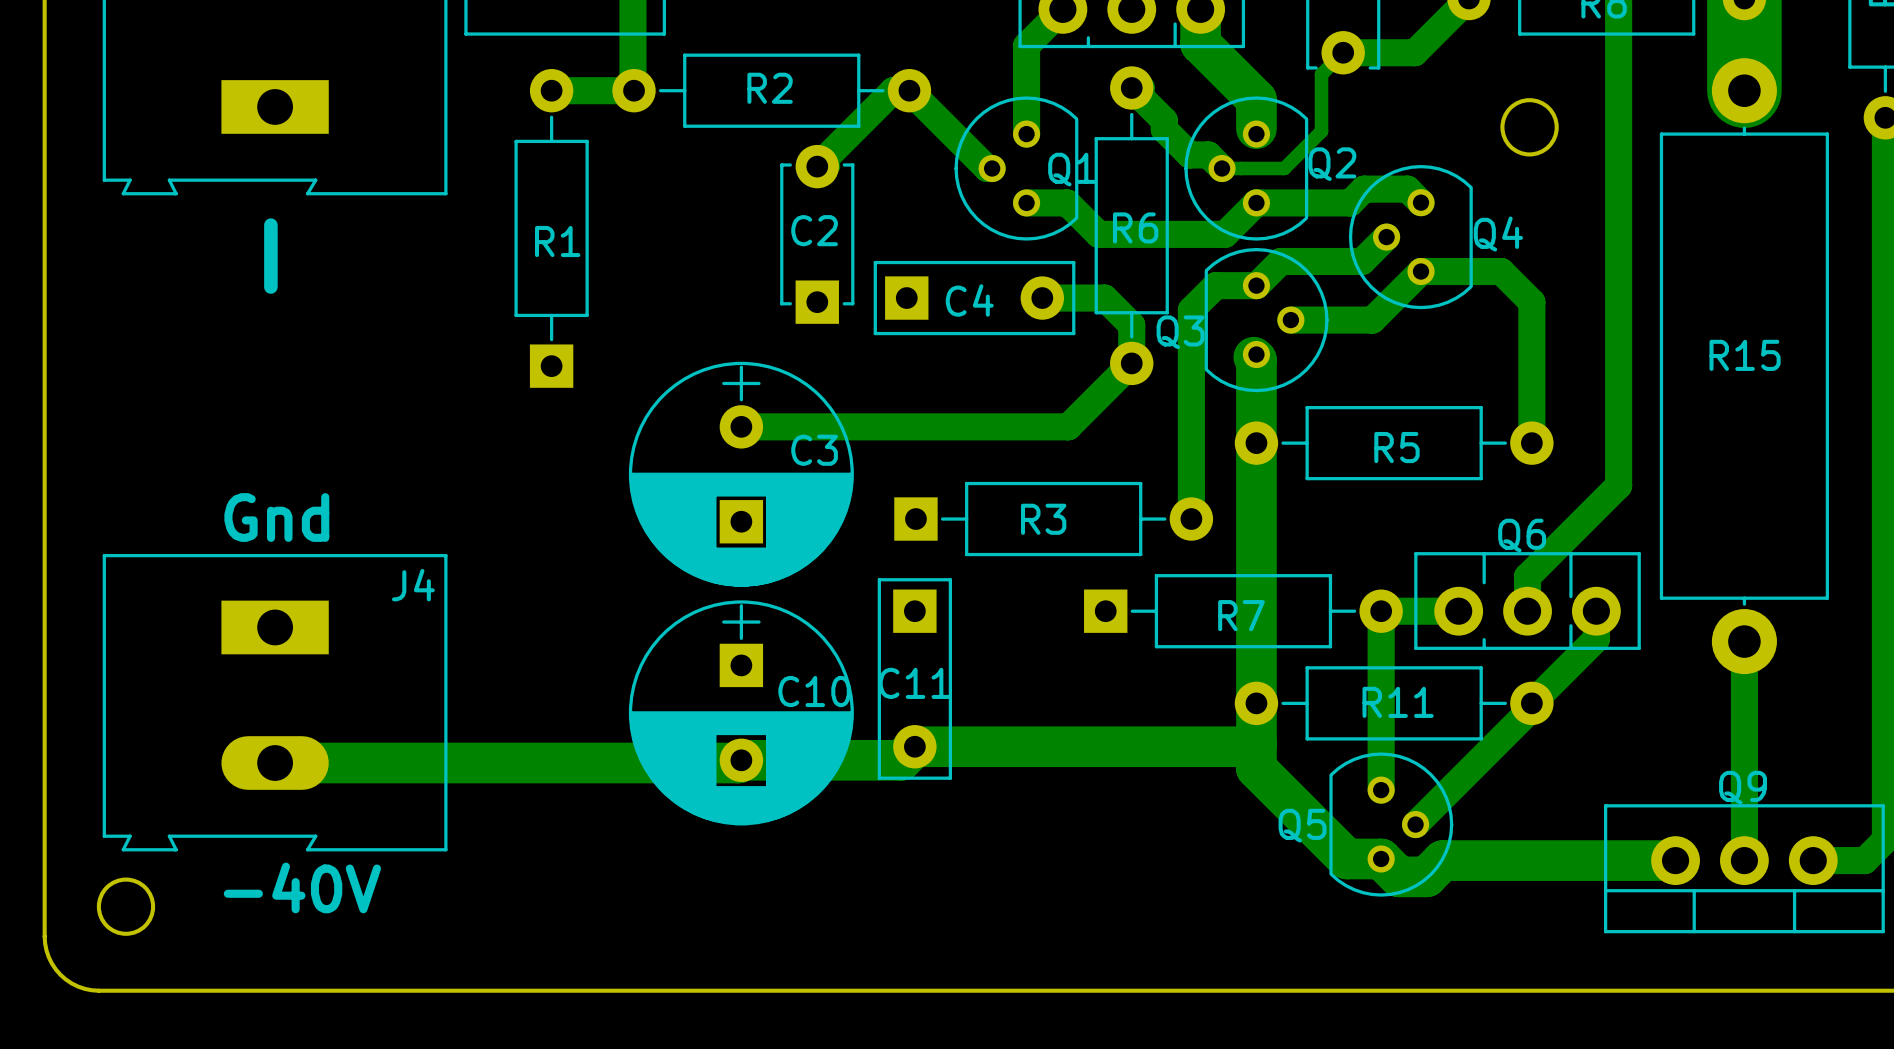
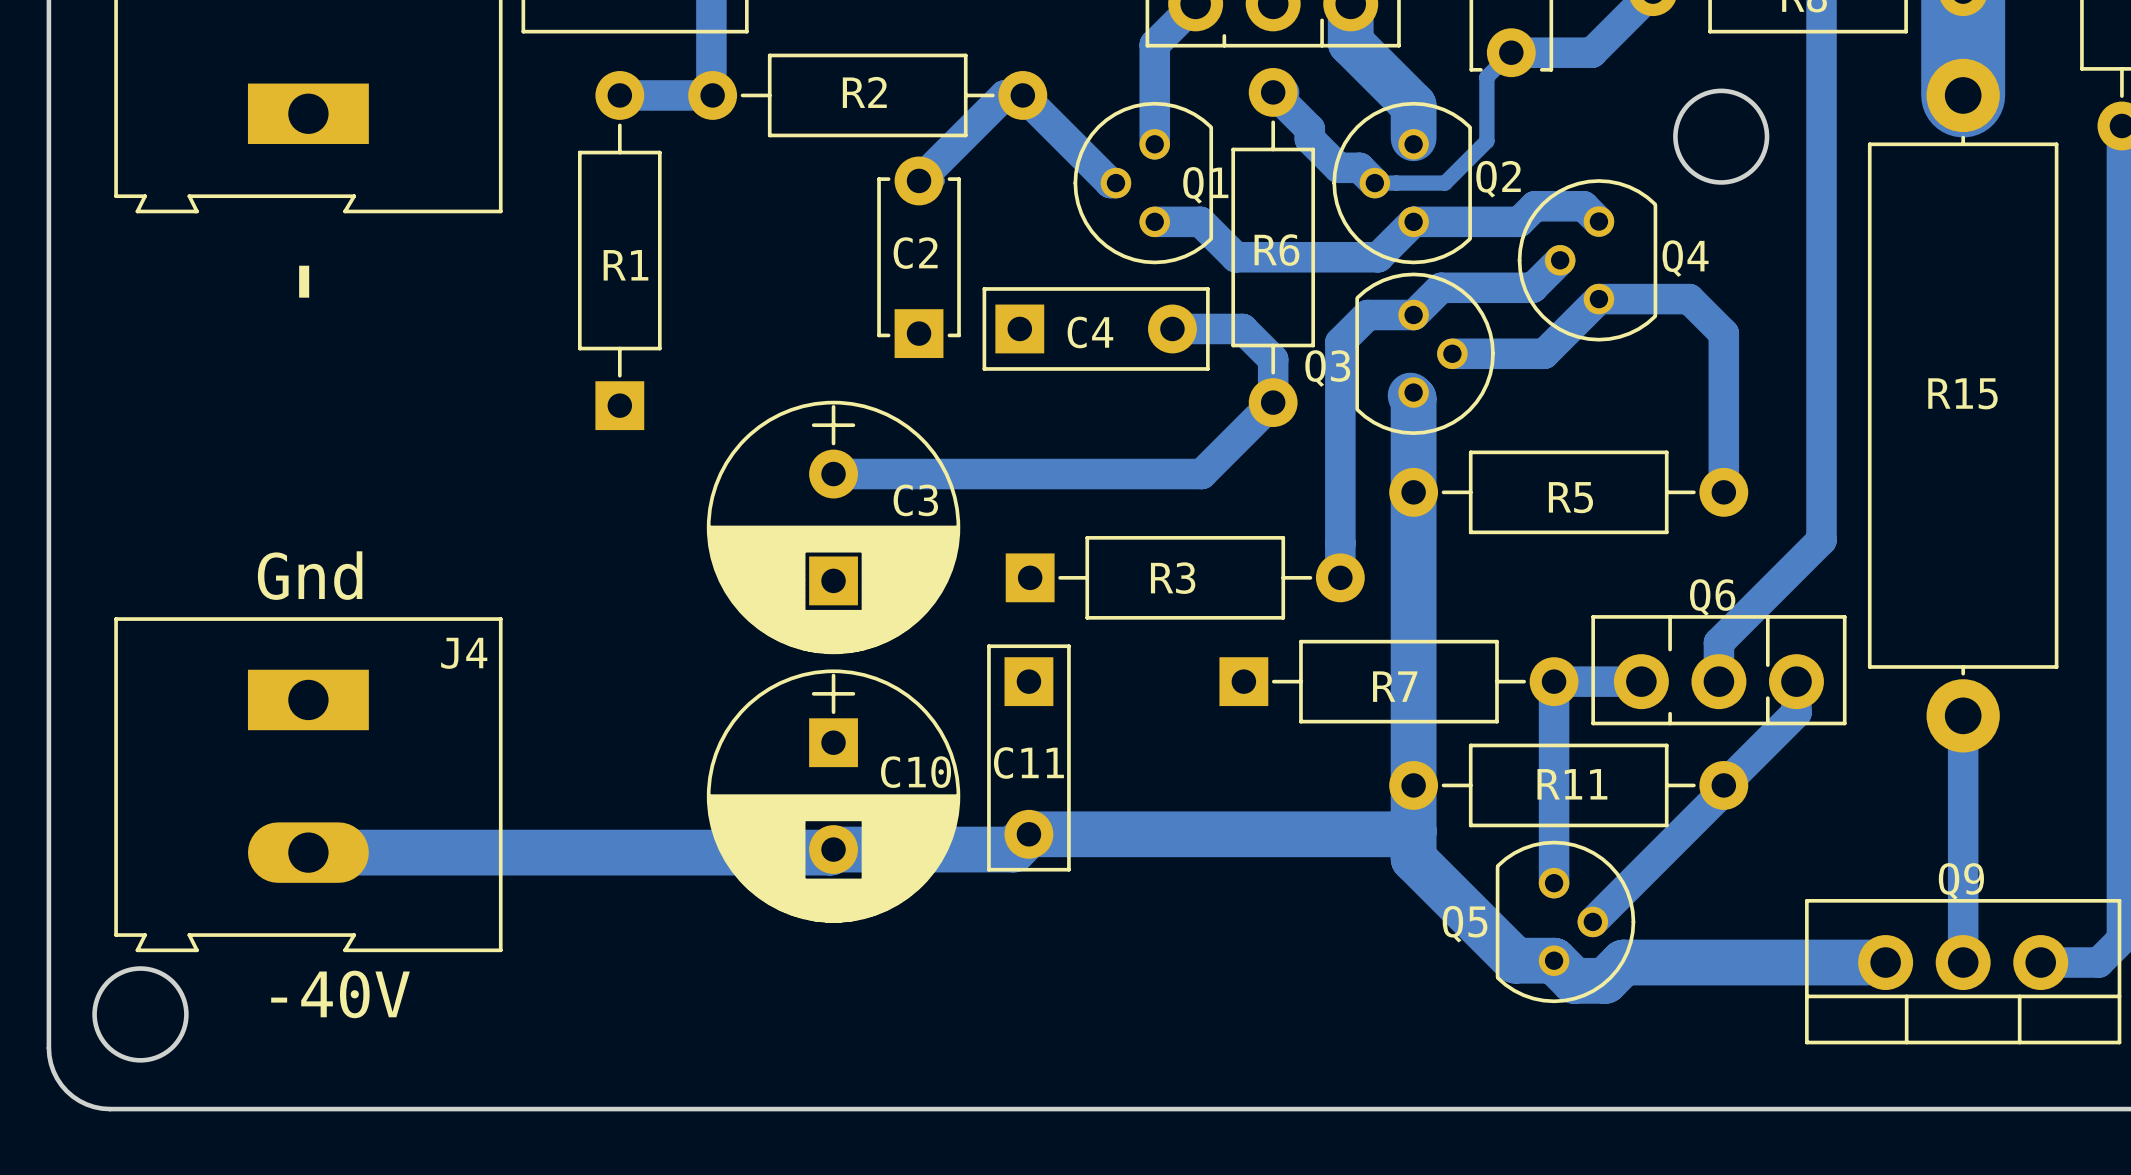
round board edge size: [1500, 98, 1559, 157] -> [1673, 88, 1770, 185]
round board edge size: [96, 877, 156, 936] -> [92, 966, 189, 1063]

